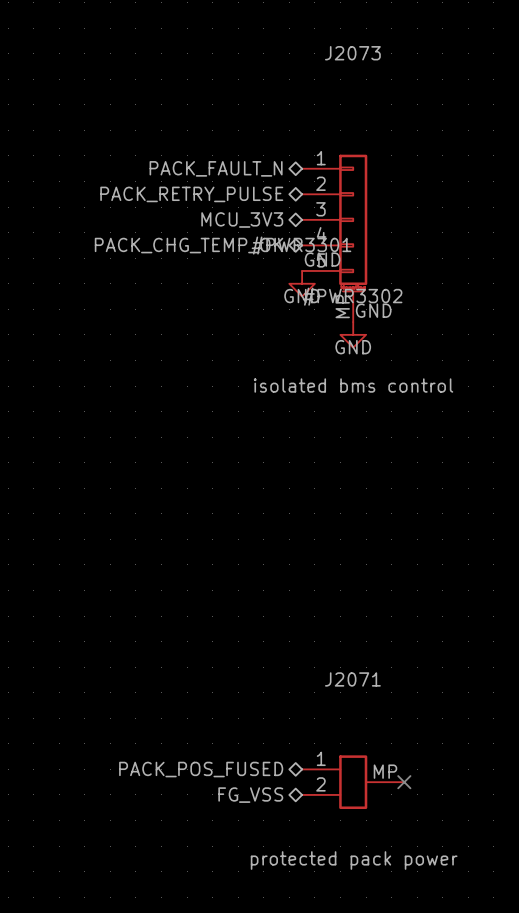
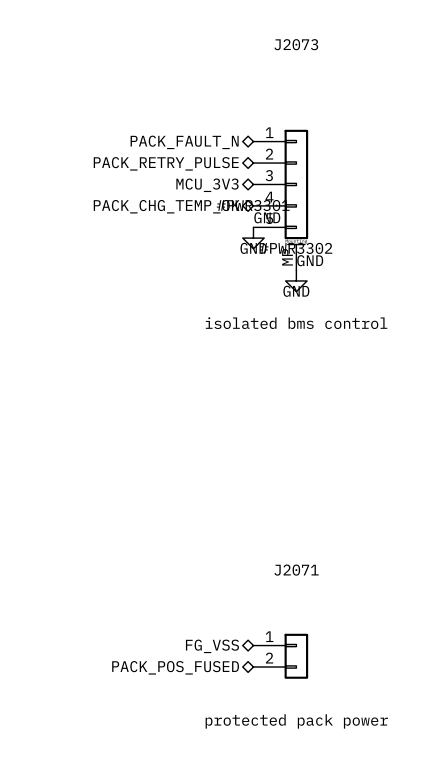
J2071 symbol: [302, 755, 405, 810] -> [253, 633, 309, 679]
hierarchical label: PACK_POS_FUSED (201, 769) -> FG_VSS (212, 646)
no-connect mark: (404, 782) -> none
hierarchical label: FG_VSS (250, 795) -> PACK_POS_FUSED (175, 667)

